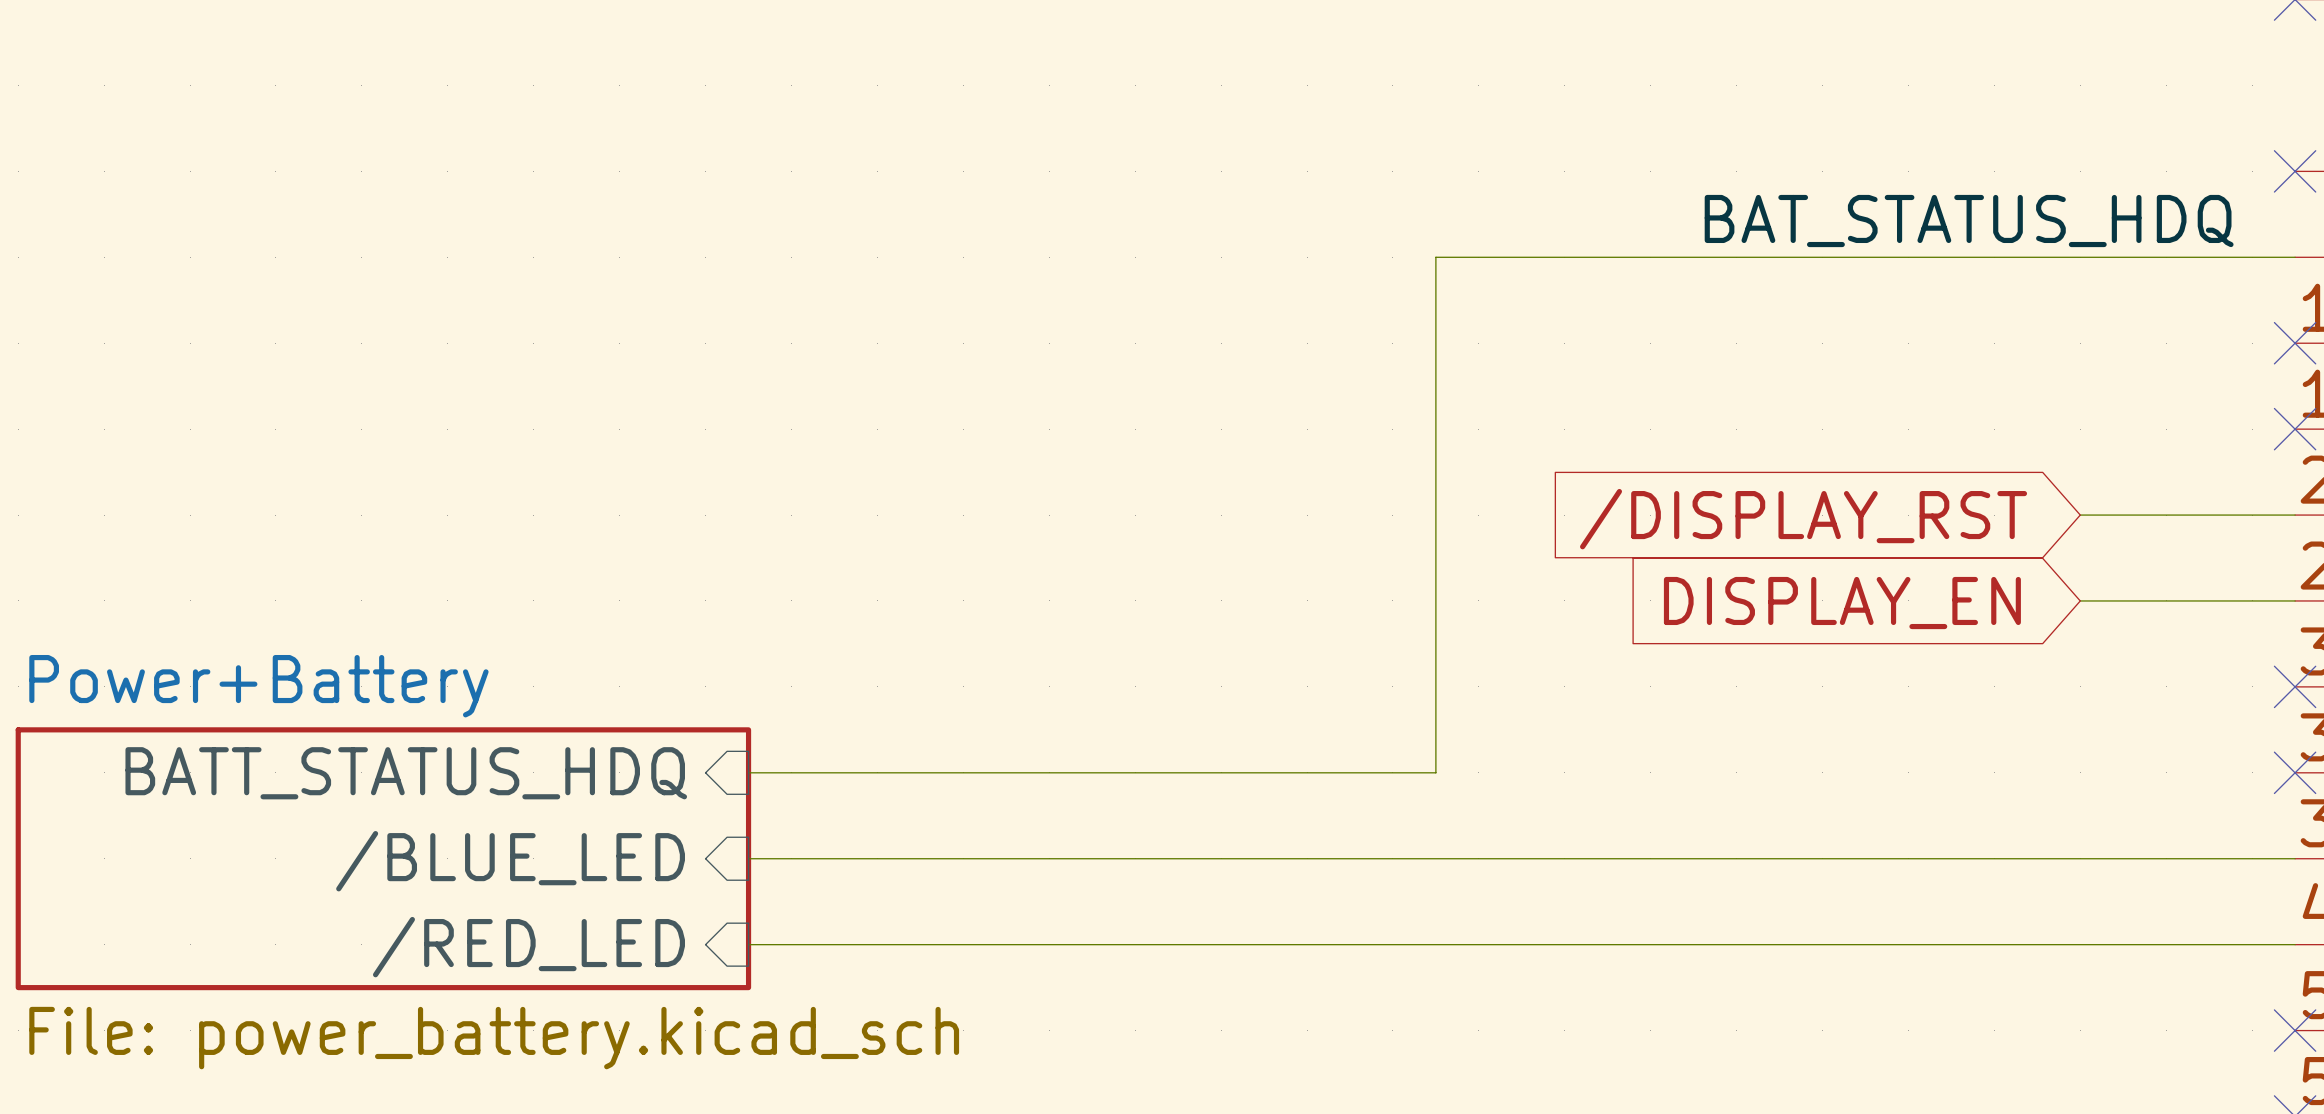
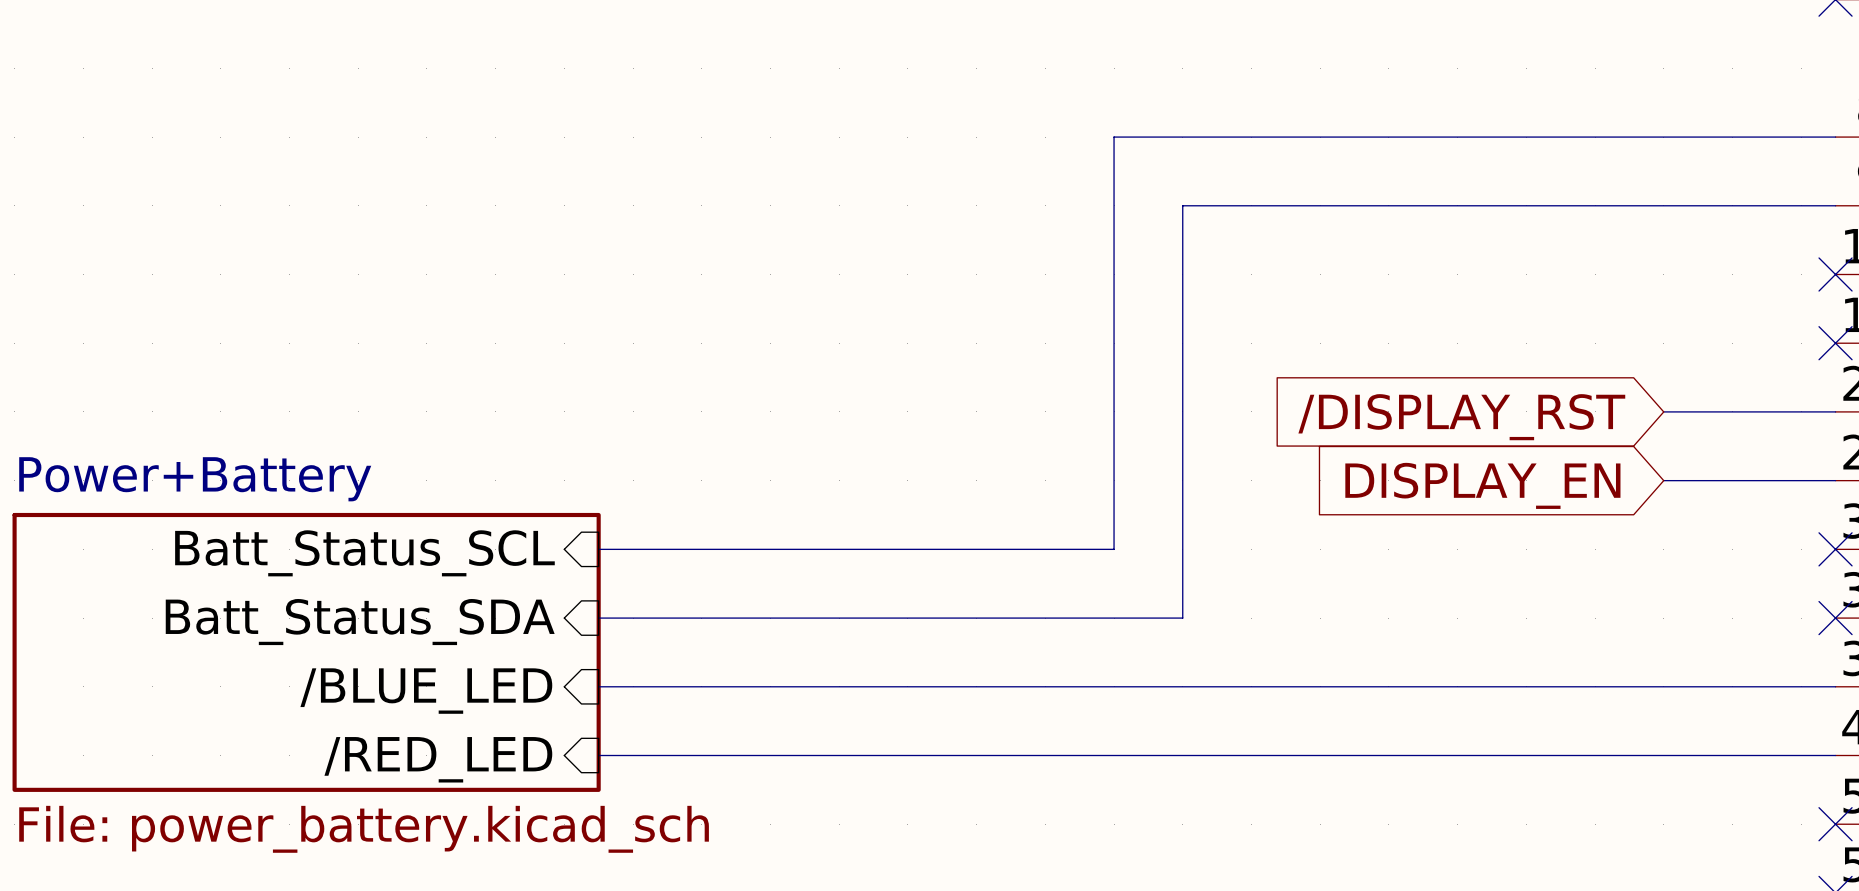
wire: none -> (1835, 137) (1114, 137) (1114, 549) (598, 549)
no-connect mark: (2295, 171) -> none
label: BAT_STATUS_HDQ (1969, 221) -> none
wire: (1478, 257) (1435, 257) (1435, 772) -> (1182, 205) (1182, 618) (1148, 618)
sheet pin: none -> Batt_Status_SCL (364, 553)
sheet pin: BATT_STATUS_HDQ (406, 773) -> Batt_Status_SDA (360, 622)
sheet Power+Battery: none -> File: power_battery.kicad_sch (306, 652)
sheet Power+Battery: File: power_battery.kicad_sch (383, 858) -> none

